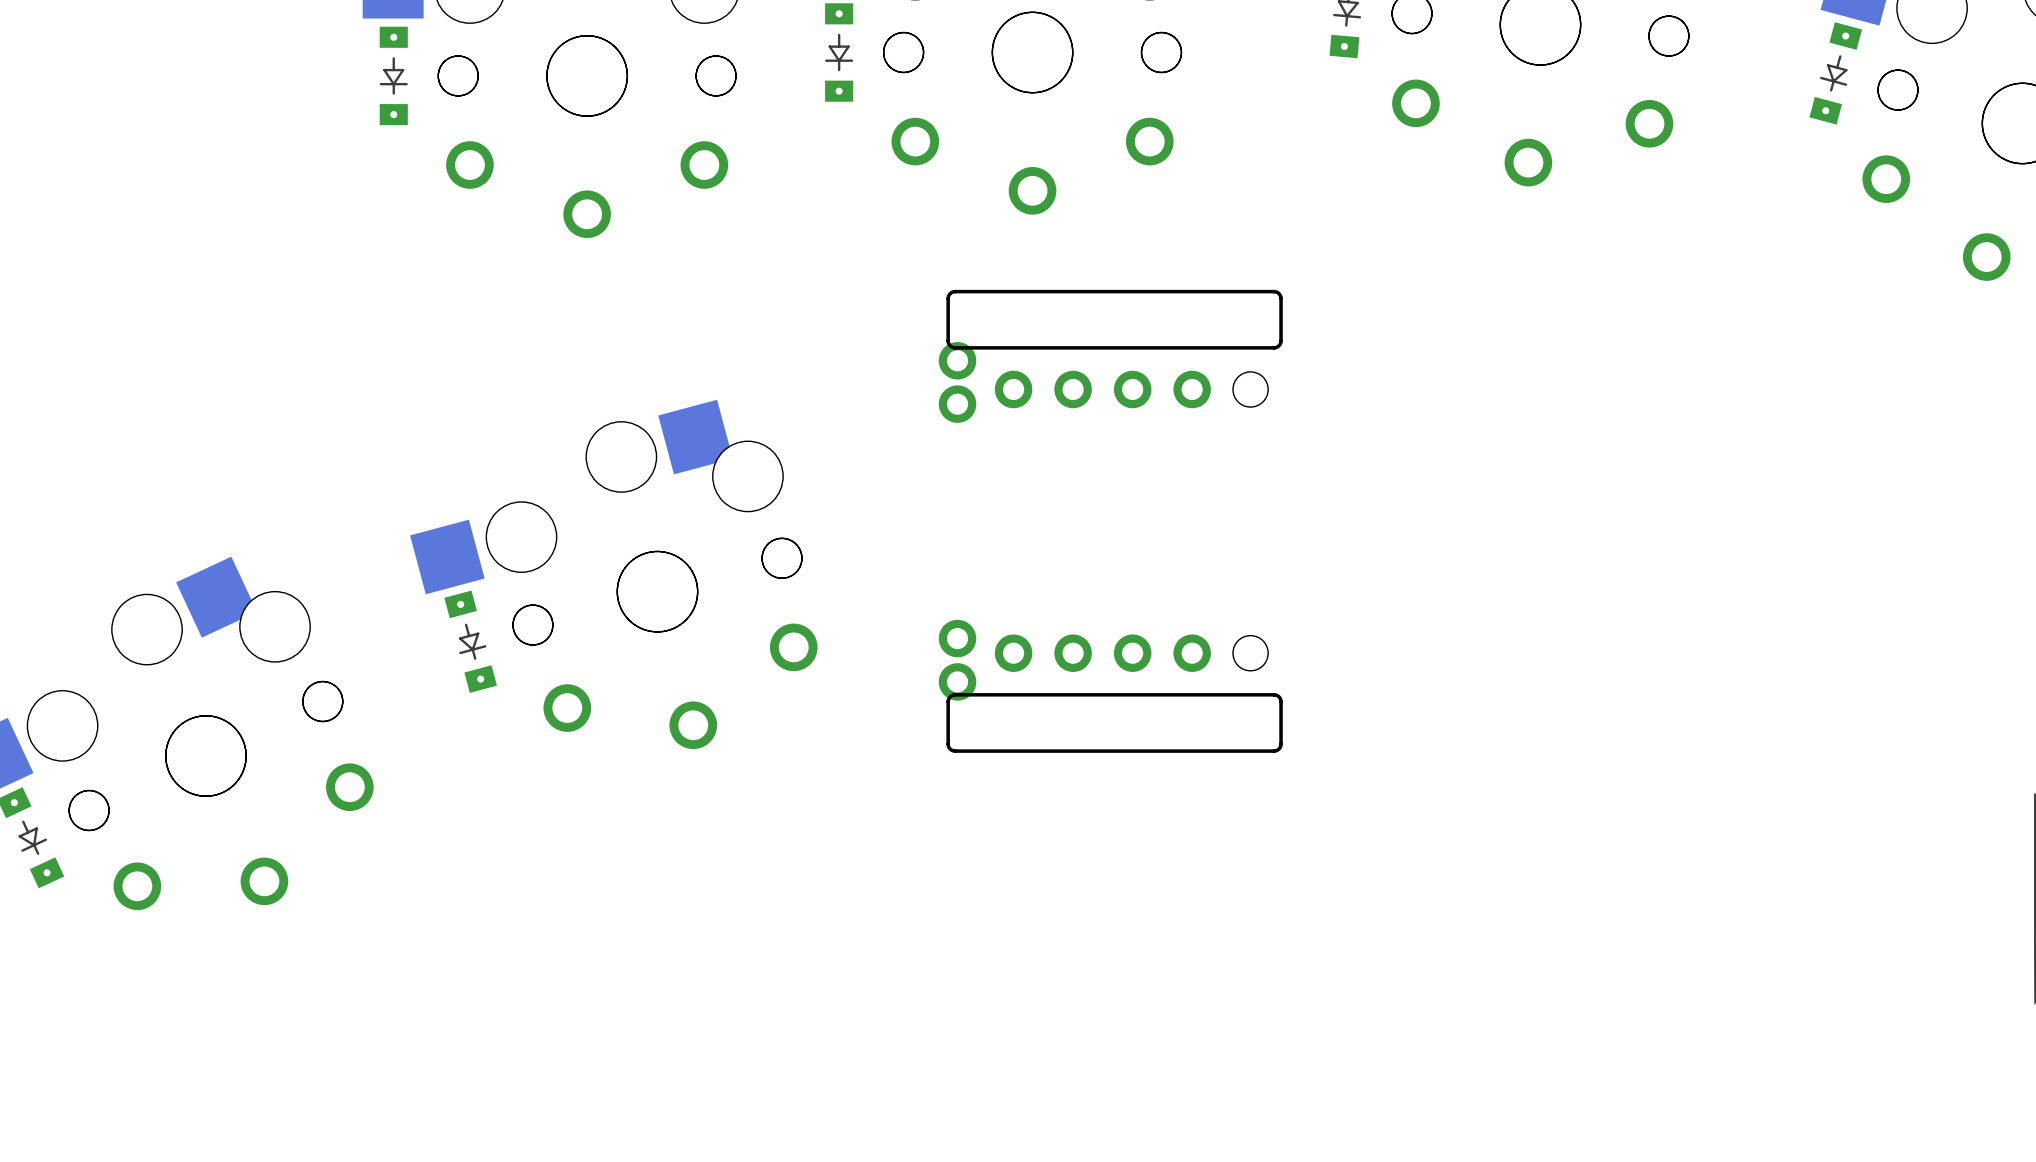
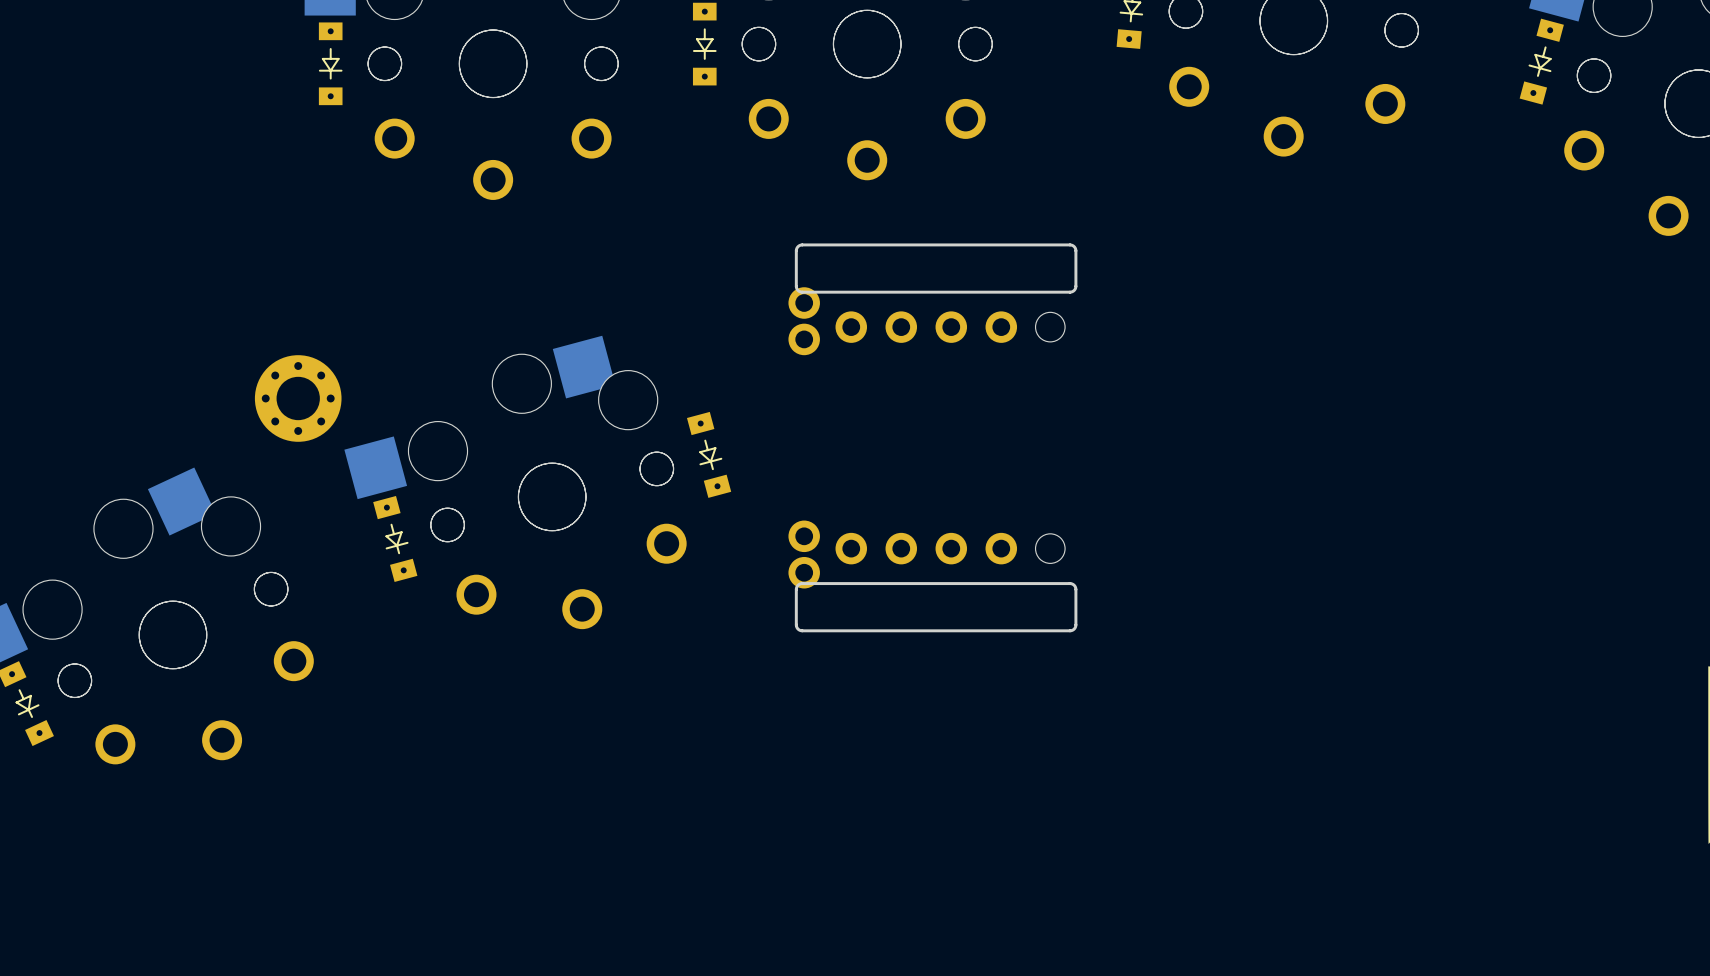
part: none -> (298, 398)
part: none -> (709, 454)

